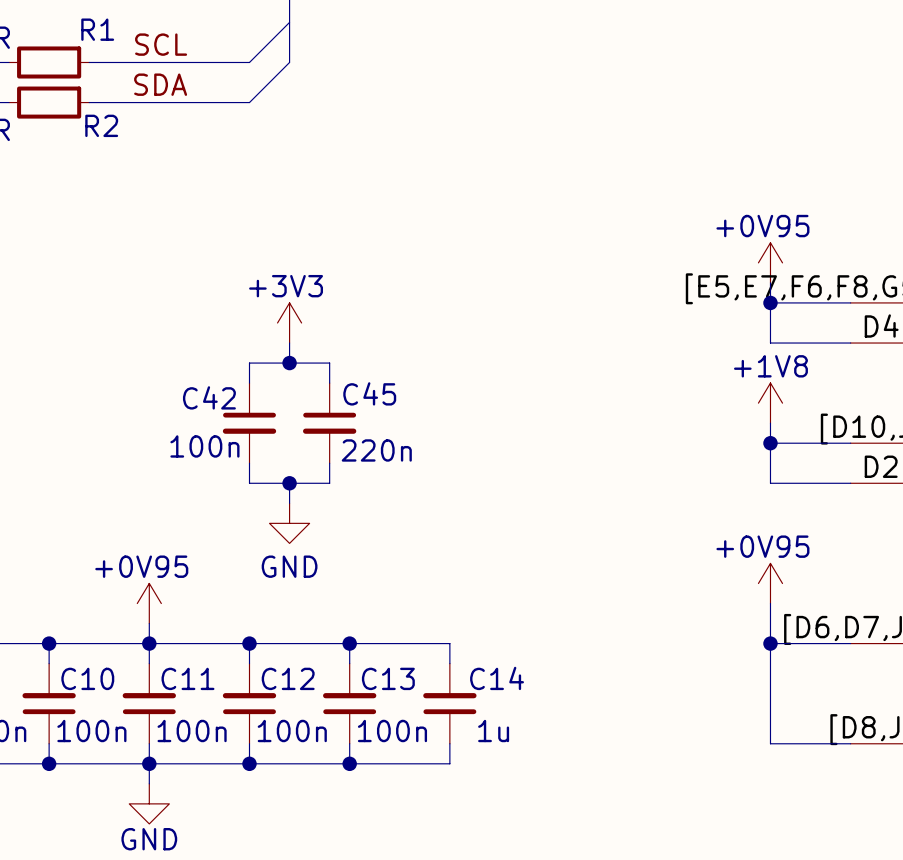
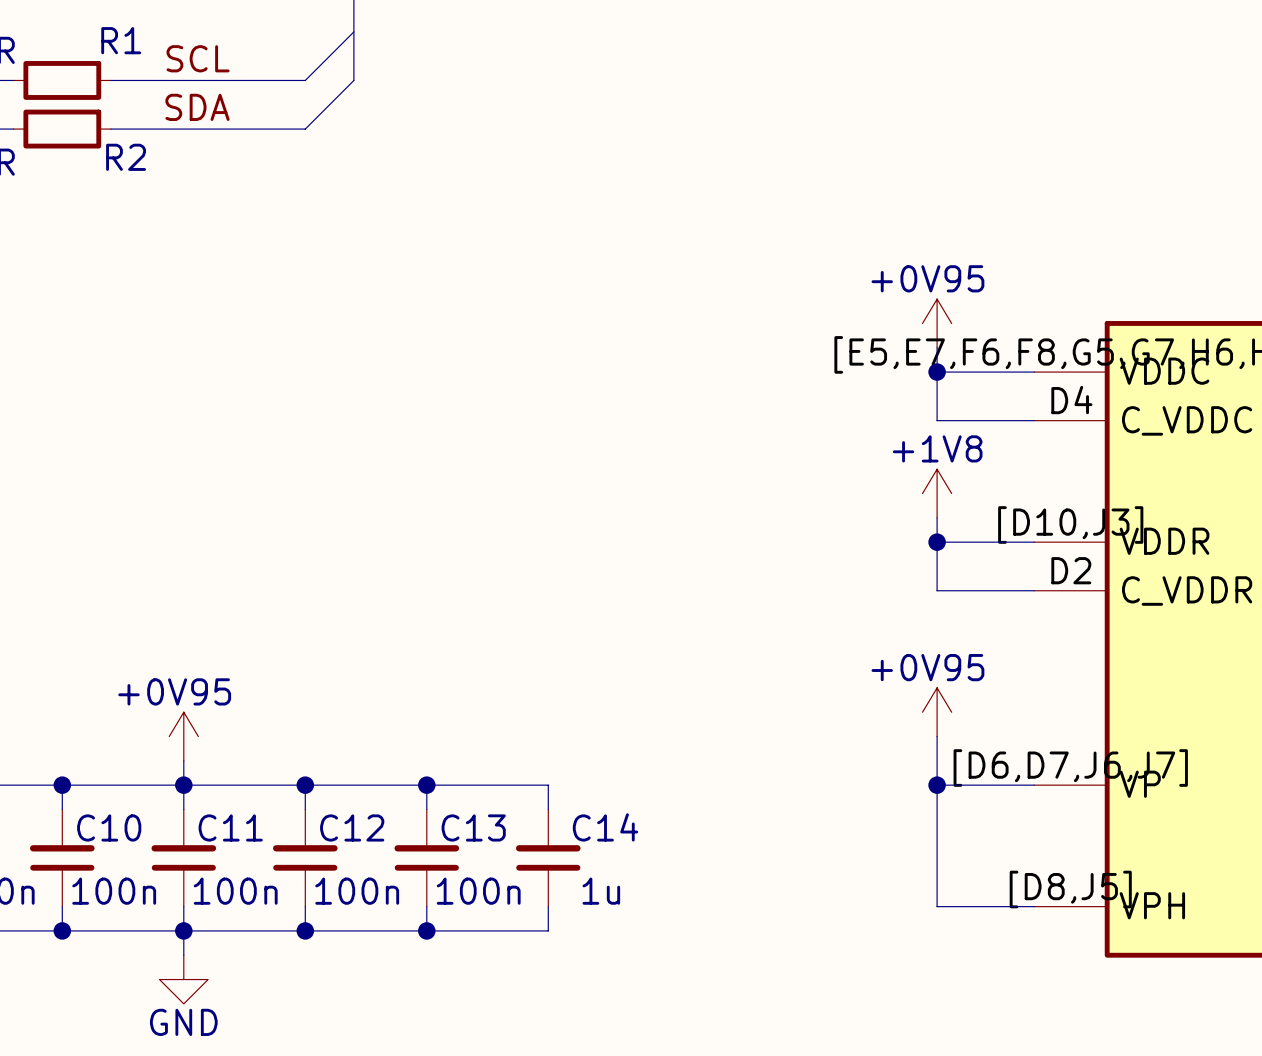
power symbol: +3V3 (289, 322) -> none
wire: (289, 343) (289, 363) -> none
junction: (289, 363) -> none
wire: (249, 383) (249, 363) (329, 363) (329, 383) -> none
C42: (249, 423) -> none
C45: (329, 423) -> none
wire: (249, 463) (249, 483) (329, 483) (329, 463) -> none
wire: (289, 483) (289, 503) -> none
junction: (289, 483) -> none
power symbol: GND (289, 523) -> none

